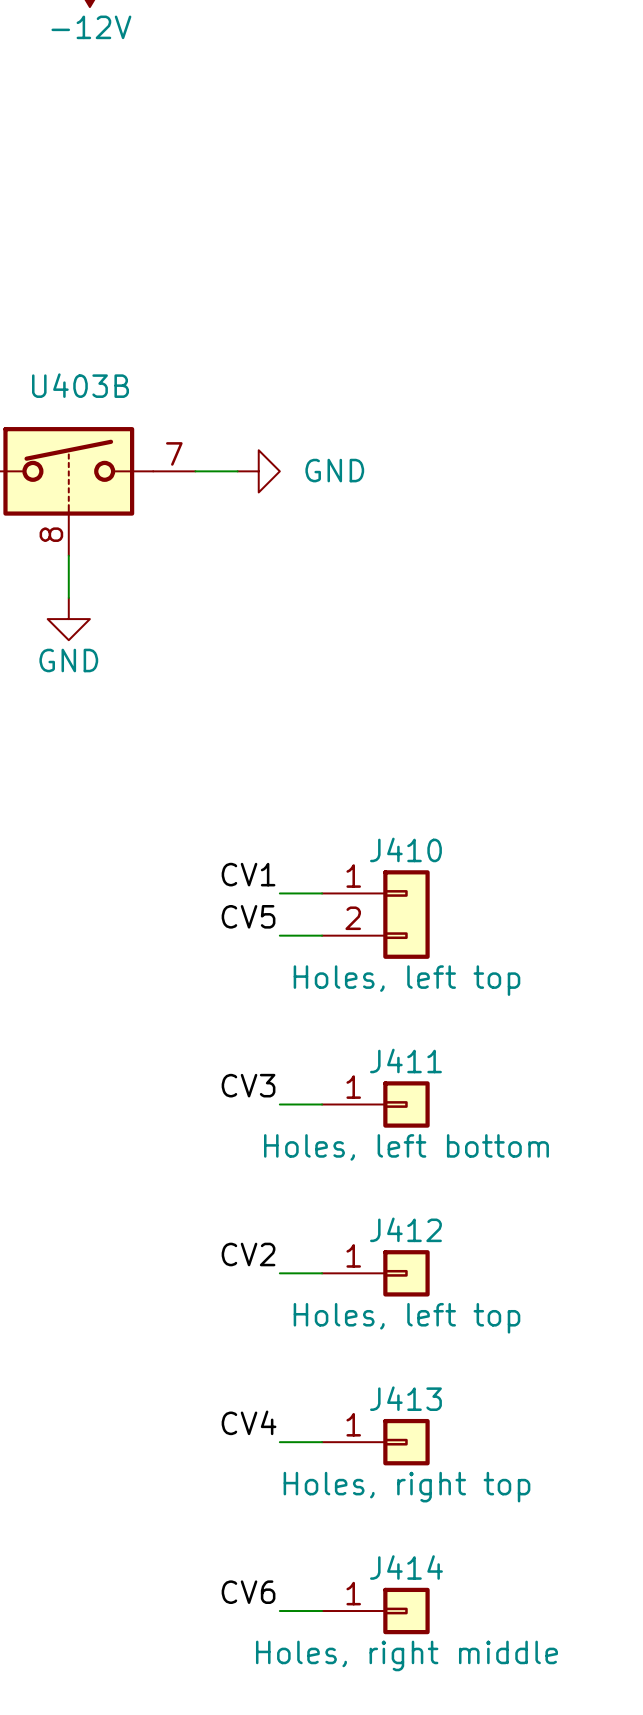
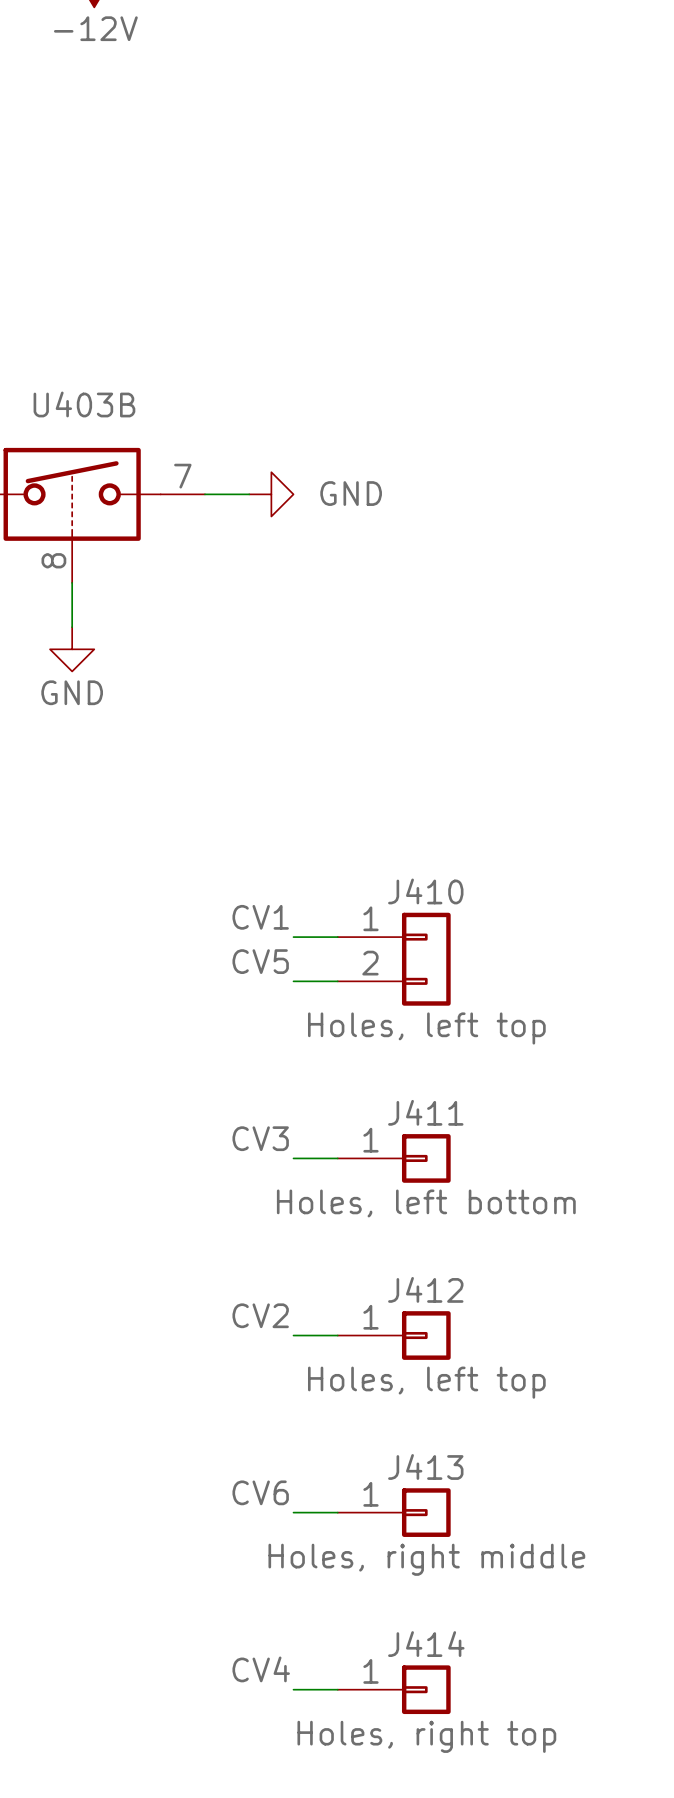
label: CV4 (249, 1422) -> CV6 (260, 1492)
J413 value: Holes, right top (406, 1487) -> Holes, right middle (426, 1559)
label: CV6 (248, 1592) -> CV4 (261, 1669)
J414 value: Holes, right middle (406, 1655) -> Holes, right top (426, 1736)

